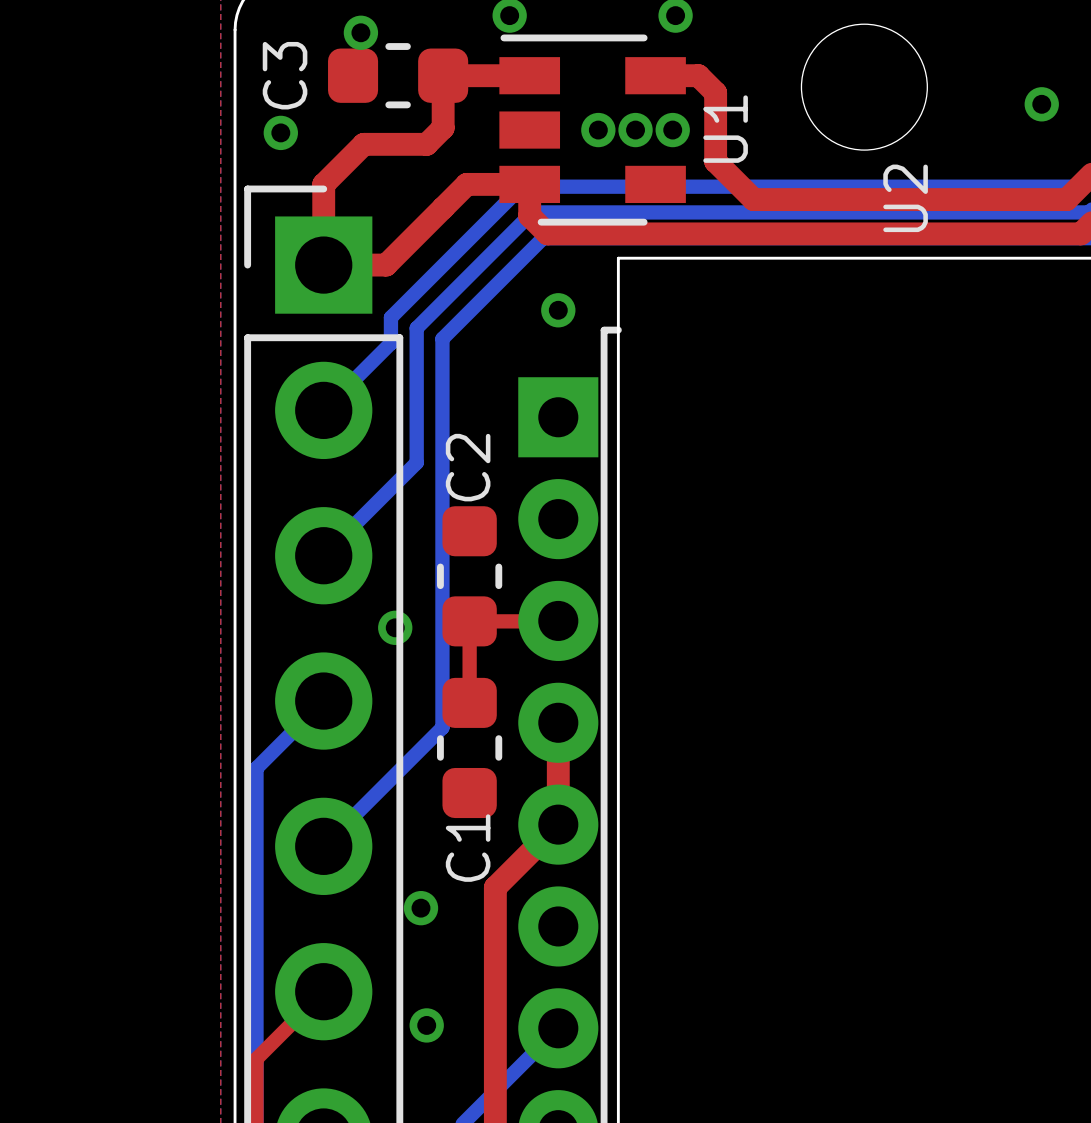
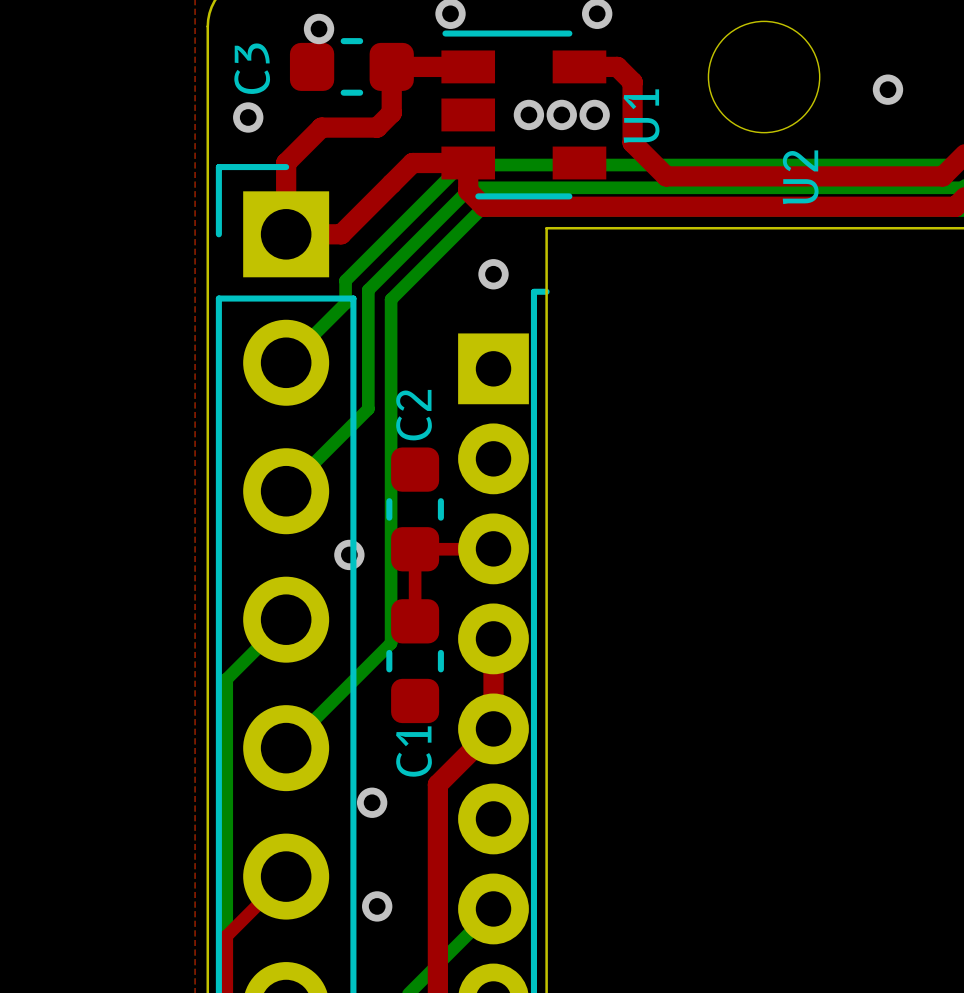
via position: (1041, 104) -> (887, 89)

